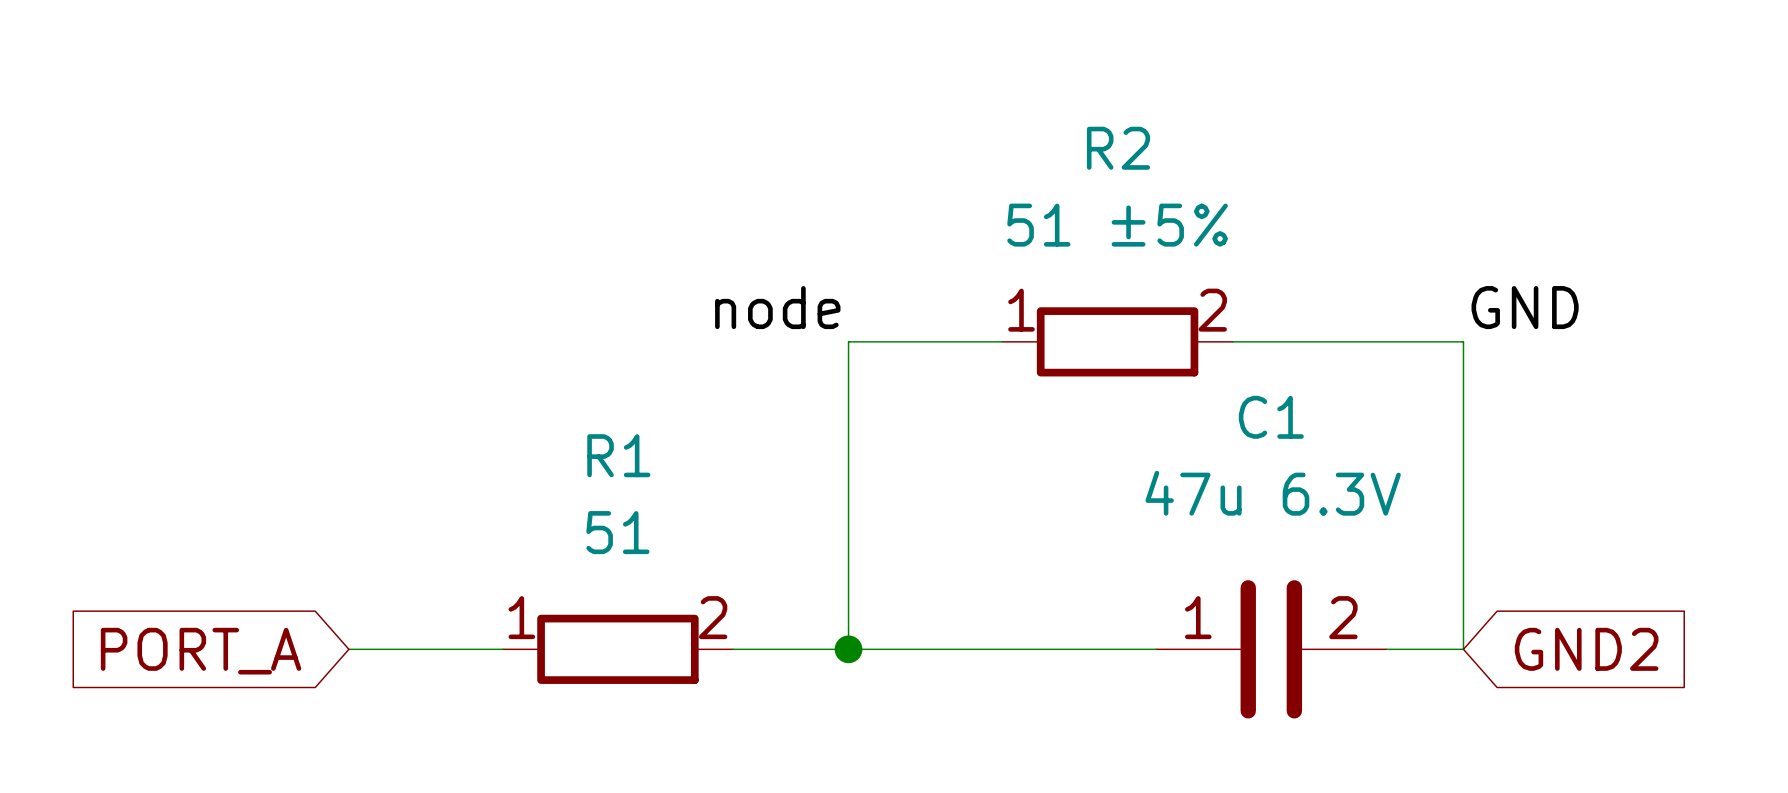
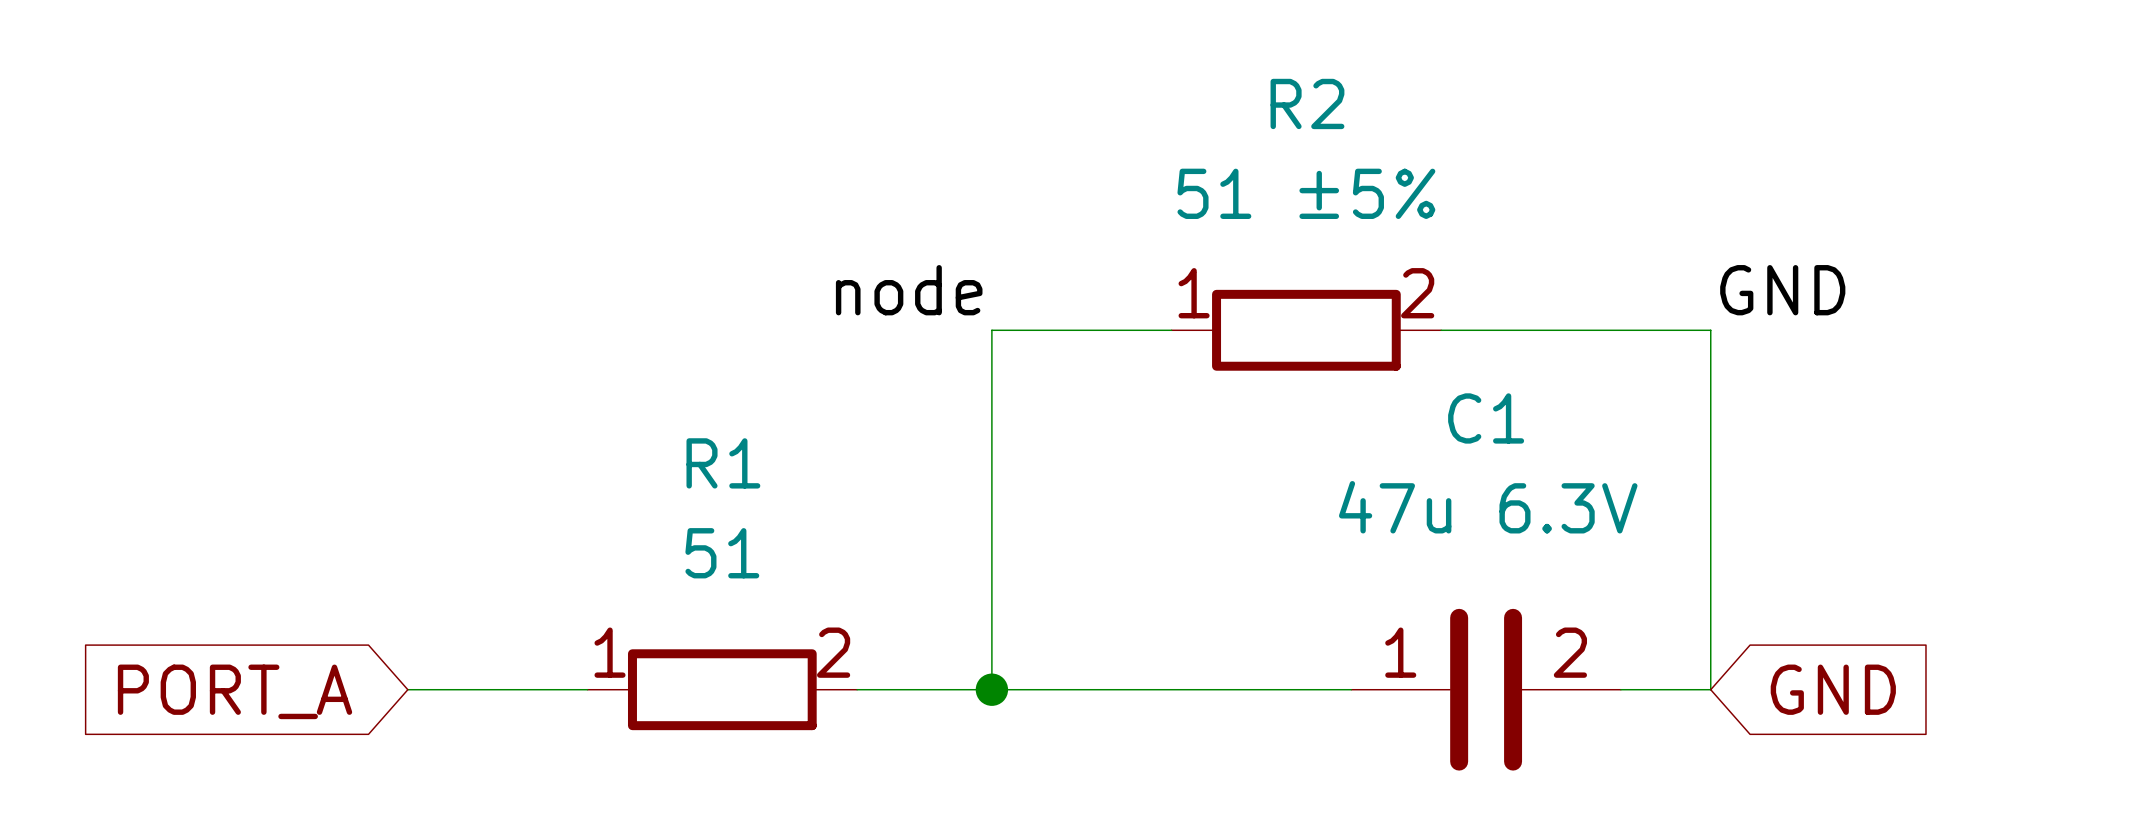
global label: GND2 (1586, 649) -> GND (1833, 689)

